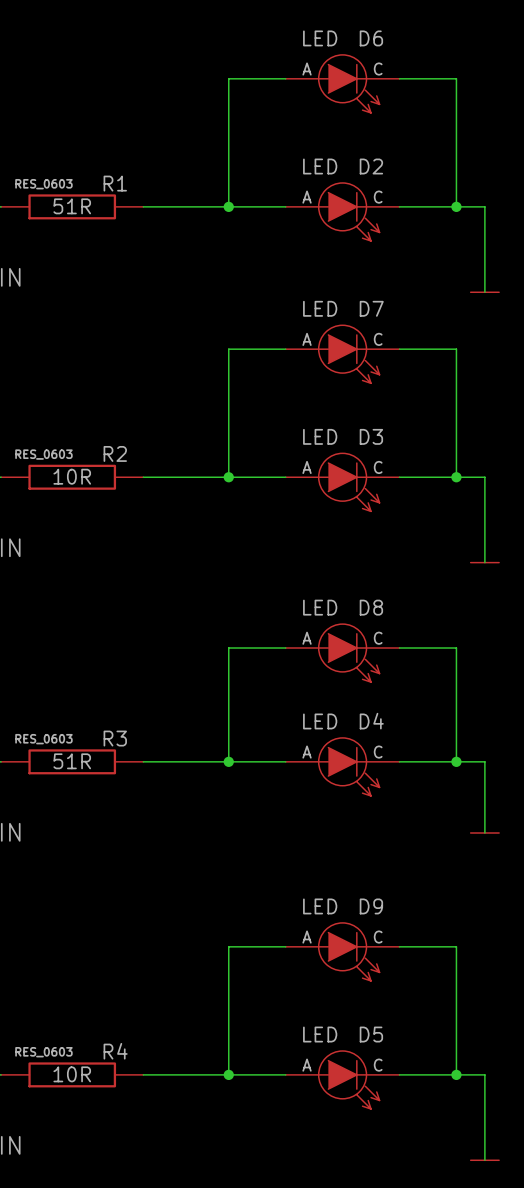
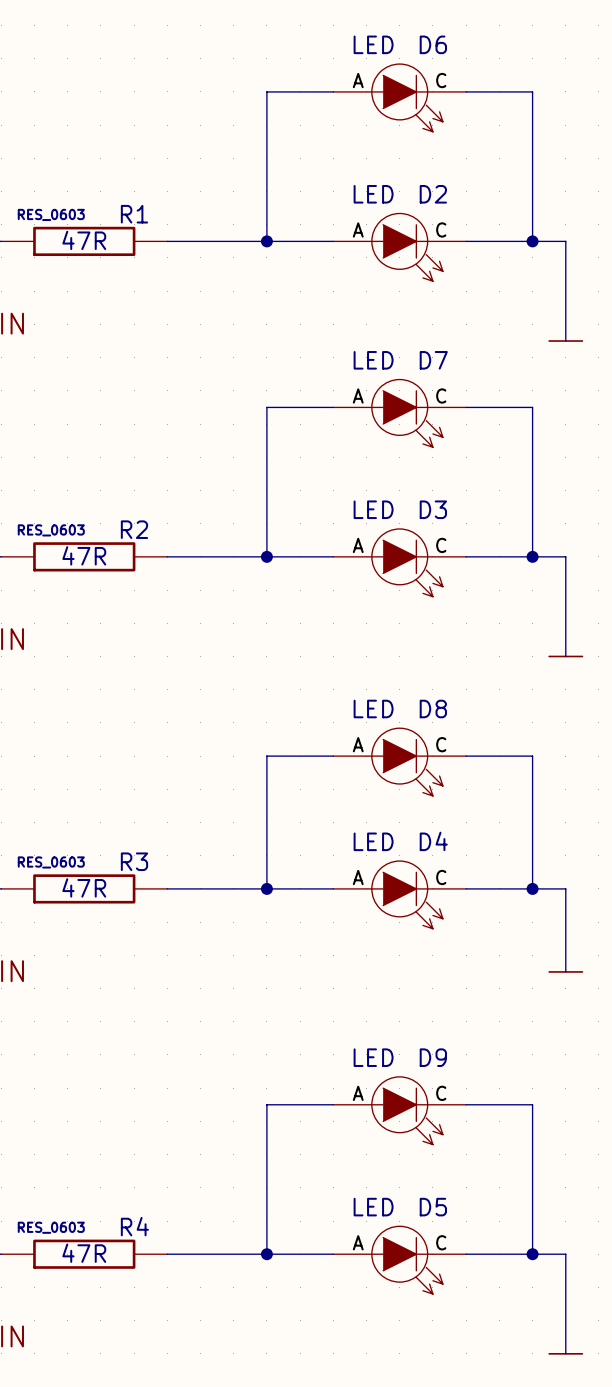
R1 value: 51R (72, 206) -> 47R (84, 240)
R2 value: 10R (72, 476) -> 47R (84, 555)
R3 value: 51R (72, 761) -> 47R (84, 887)
R4 value: 10R (72, 1074) -> 47R (84, 1253)

